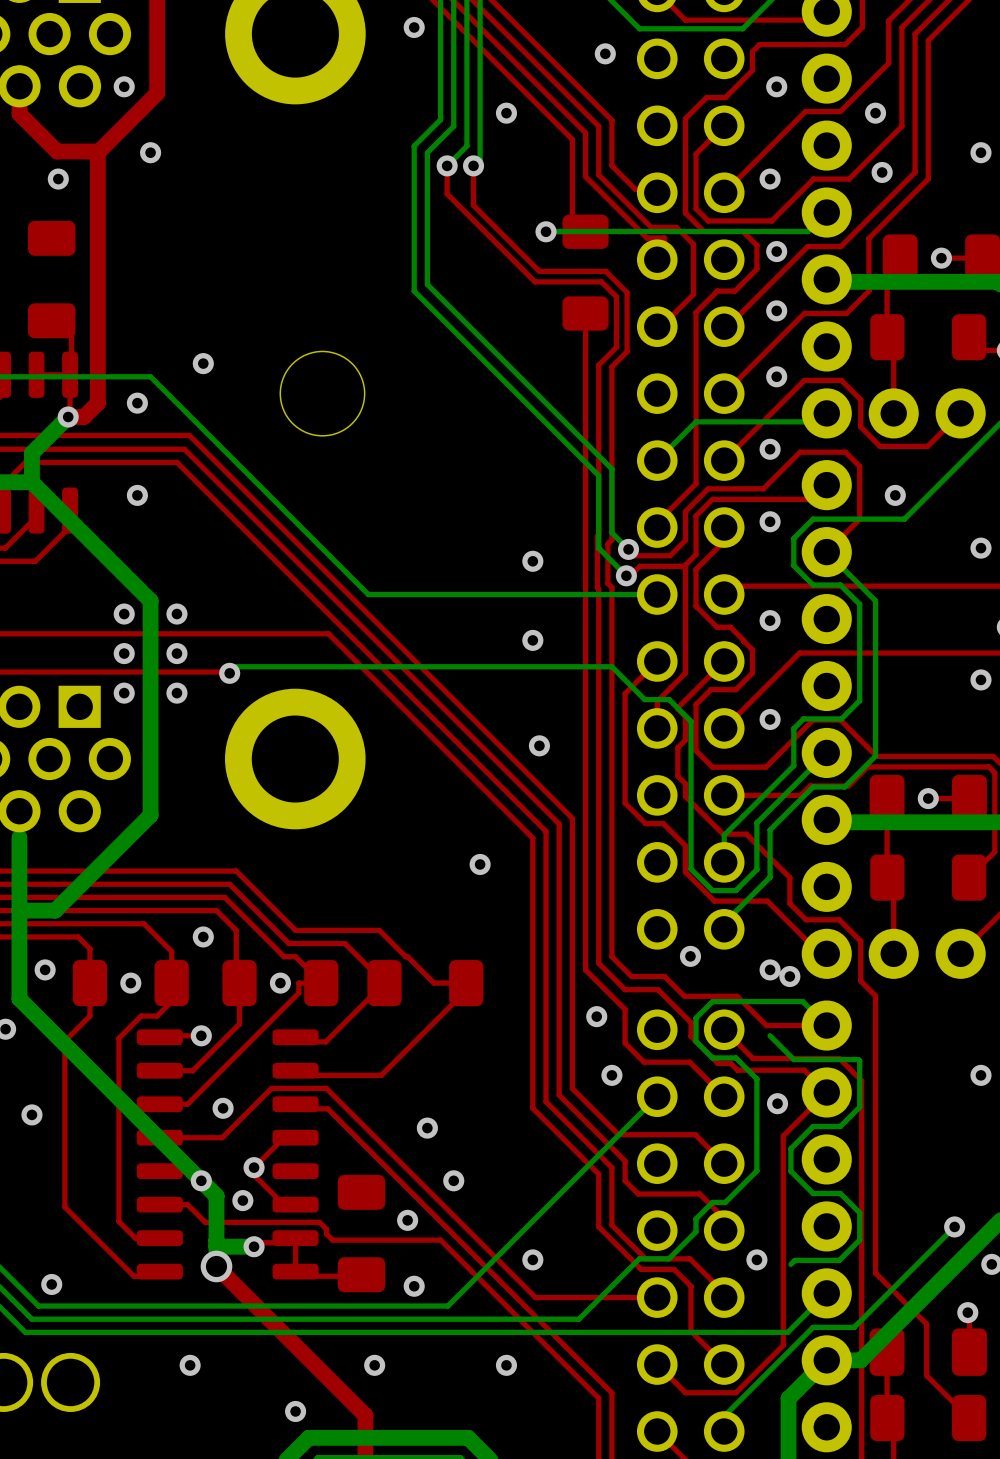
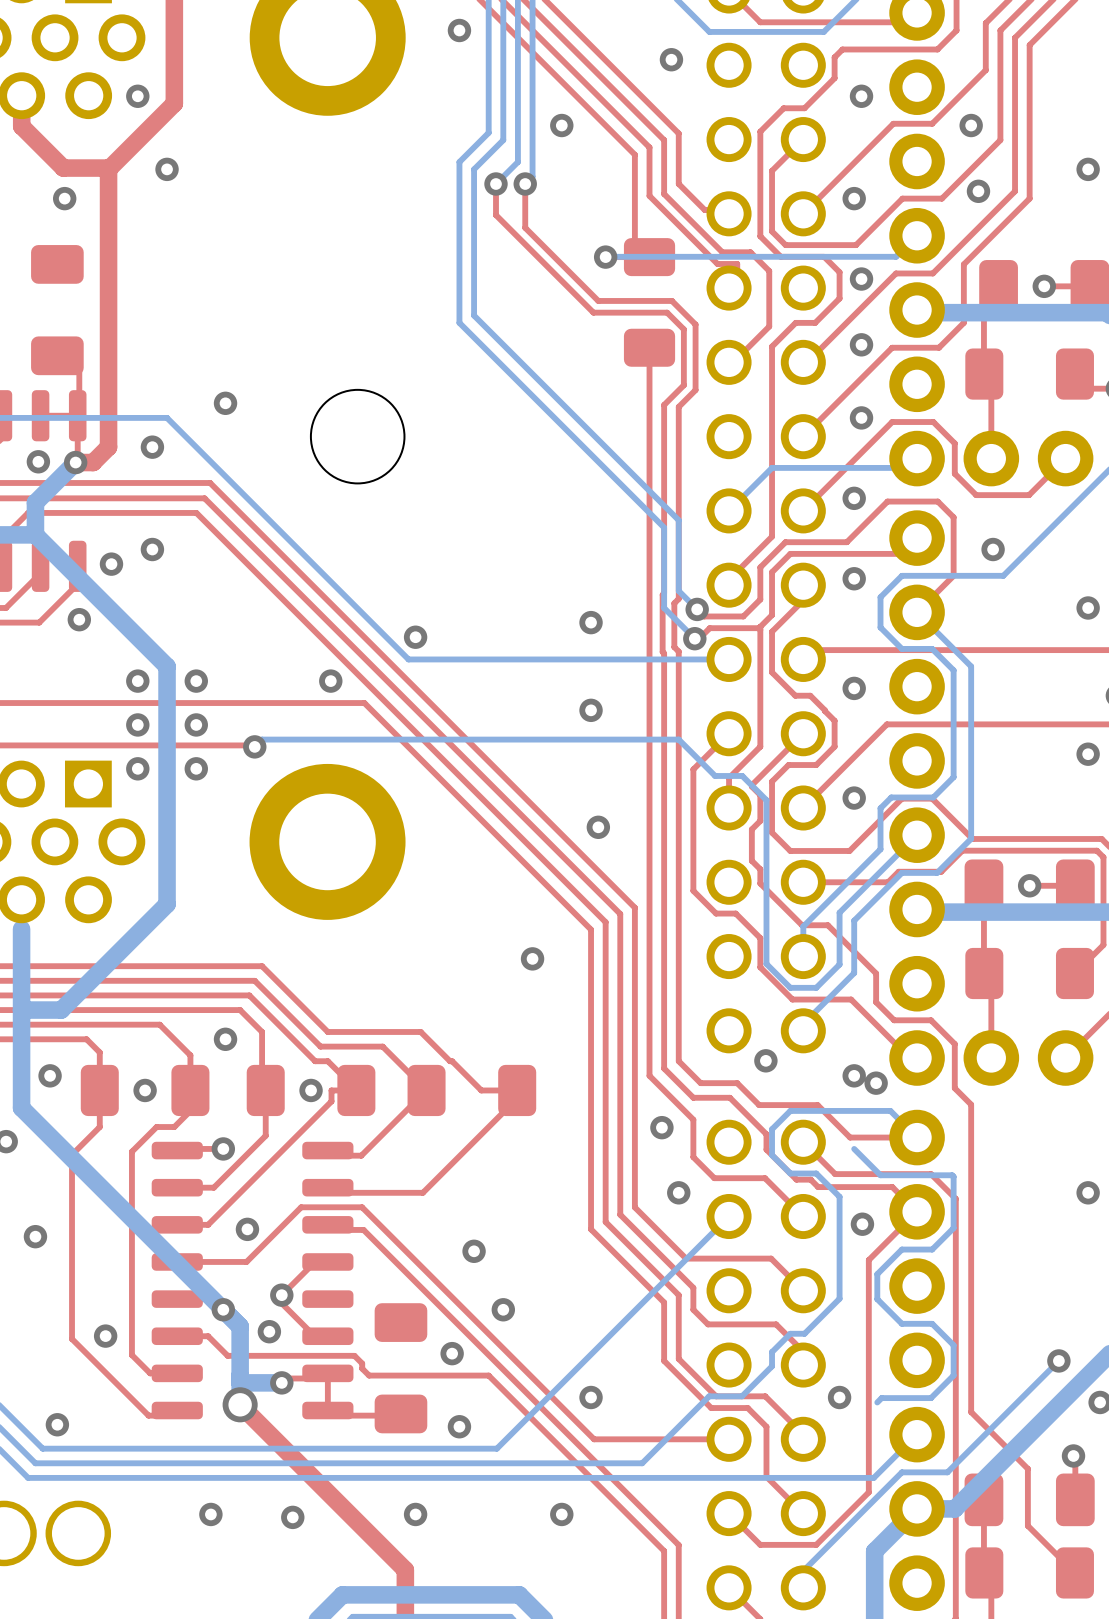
via: none -> (38, 461)
via: none -> (111, 564)
via: none -> (79, 619)
via: none -> (415, 637)
via: none -> (330, 681)
via: none -> (105, 1336)
via position: (295, 1411) -> (292, 1517)

